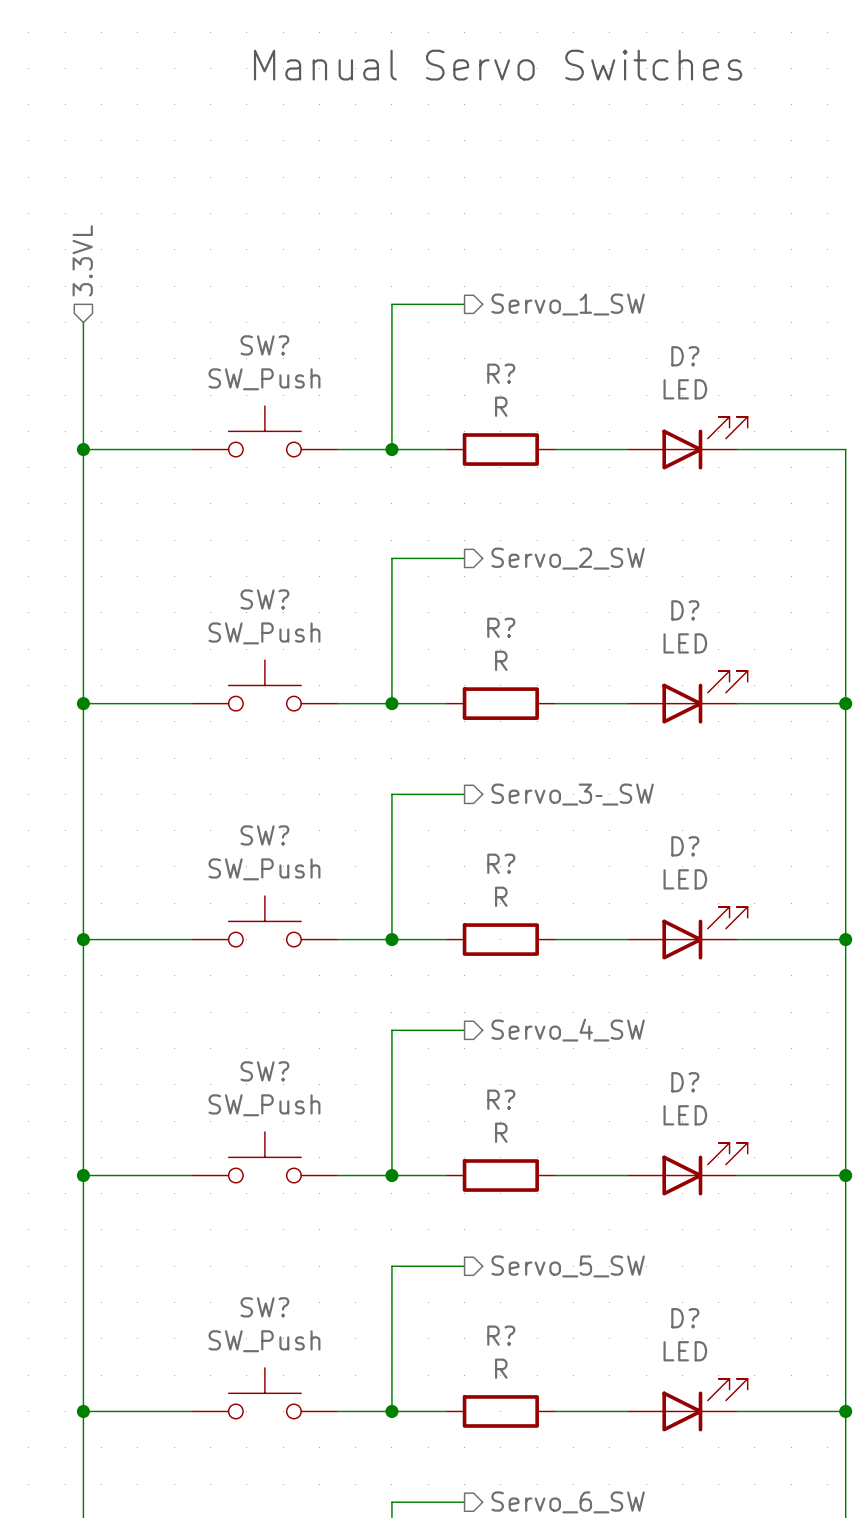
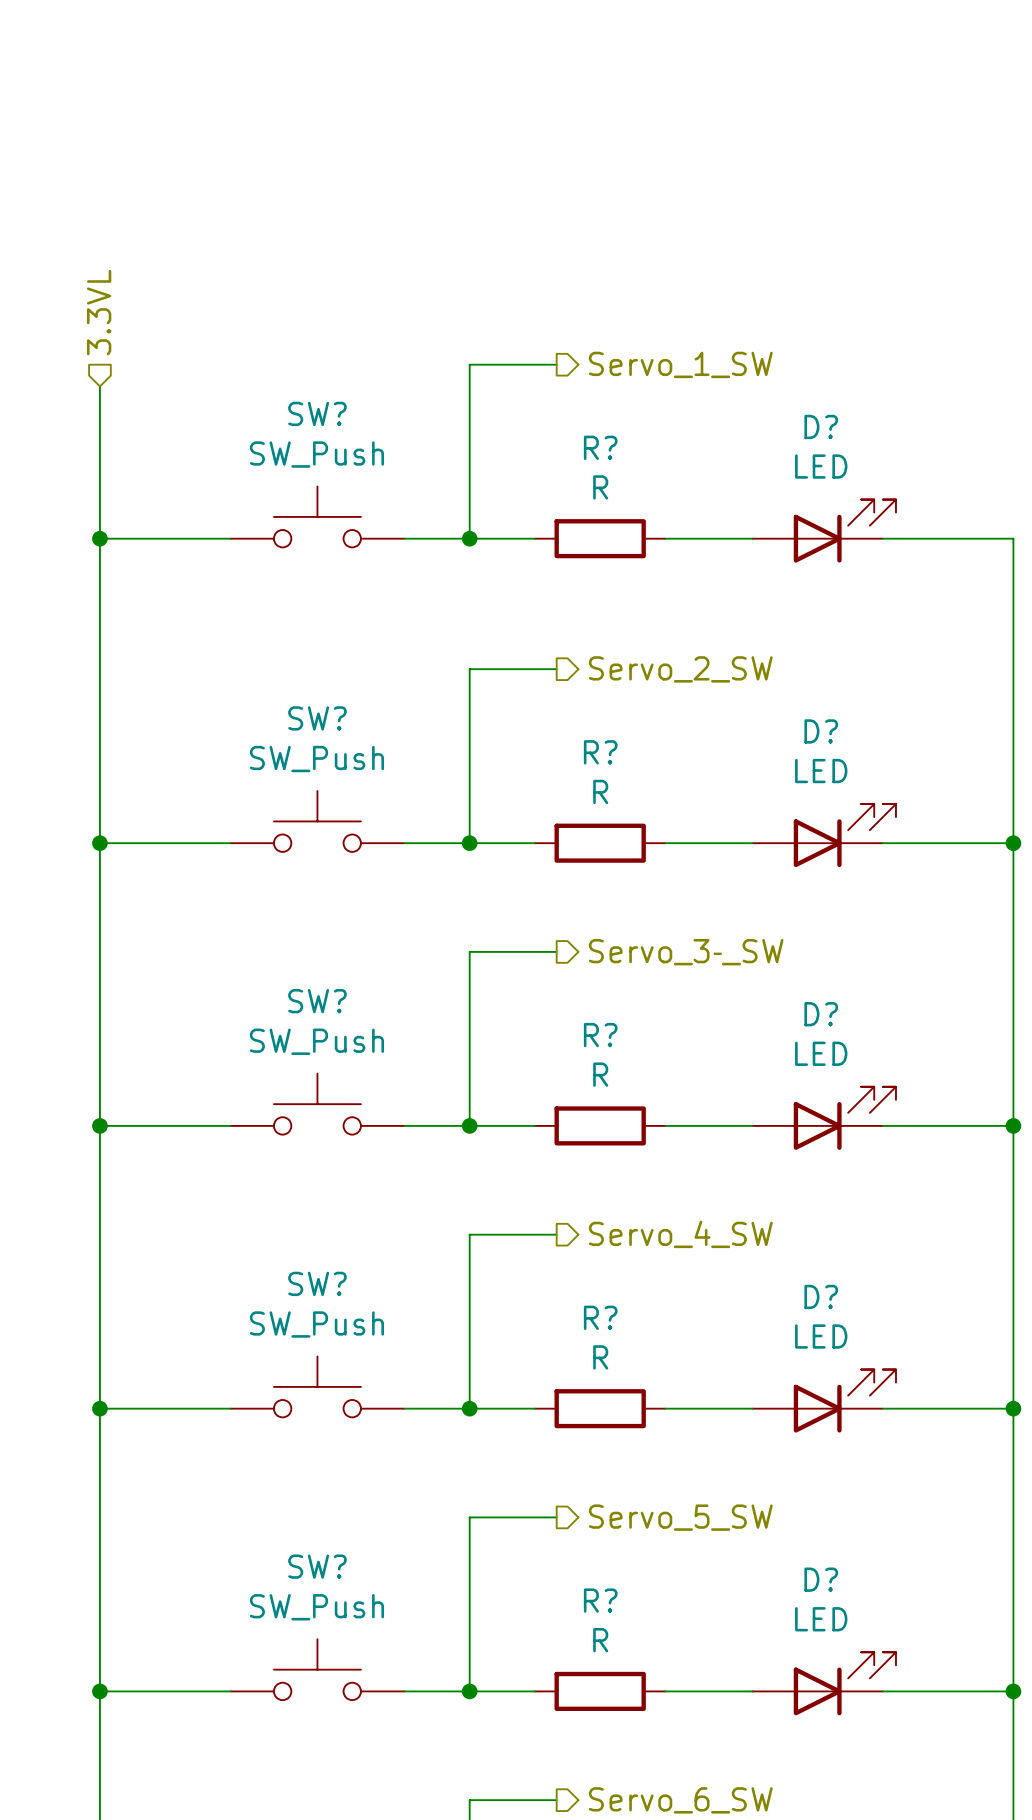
text: Manual Servo Switches (498, 65) -> none

